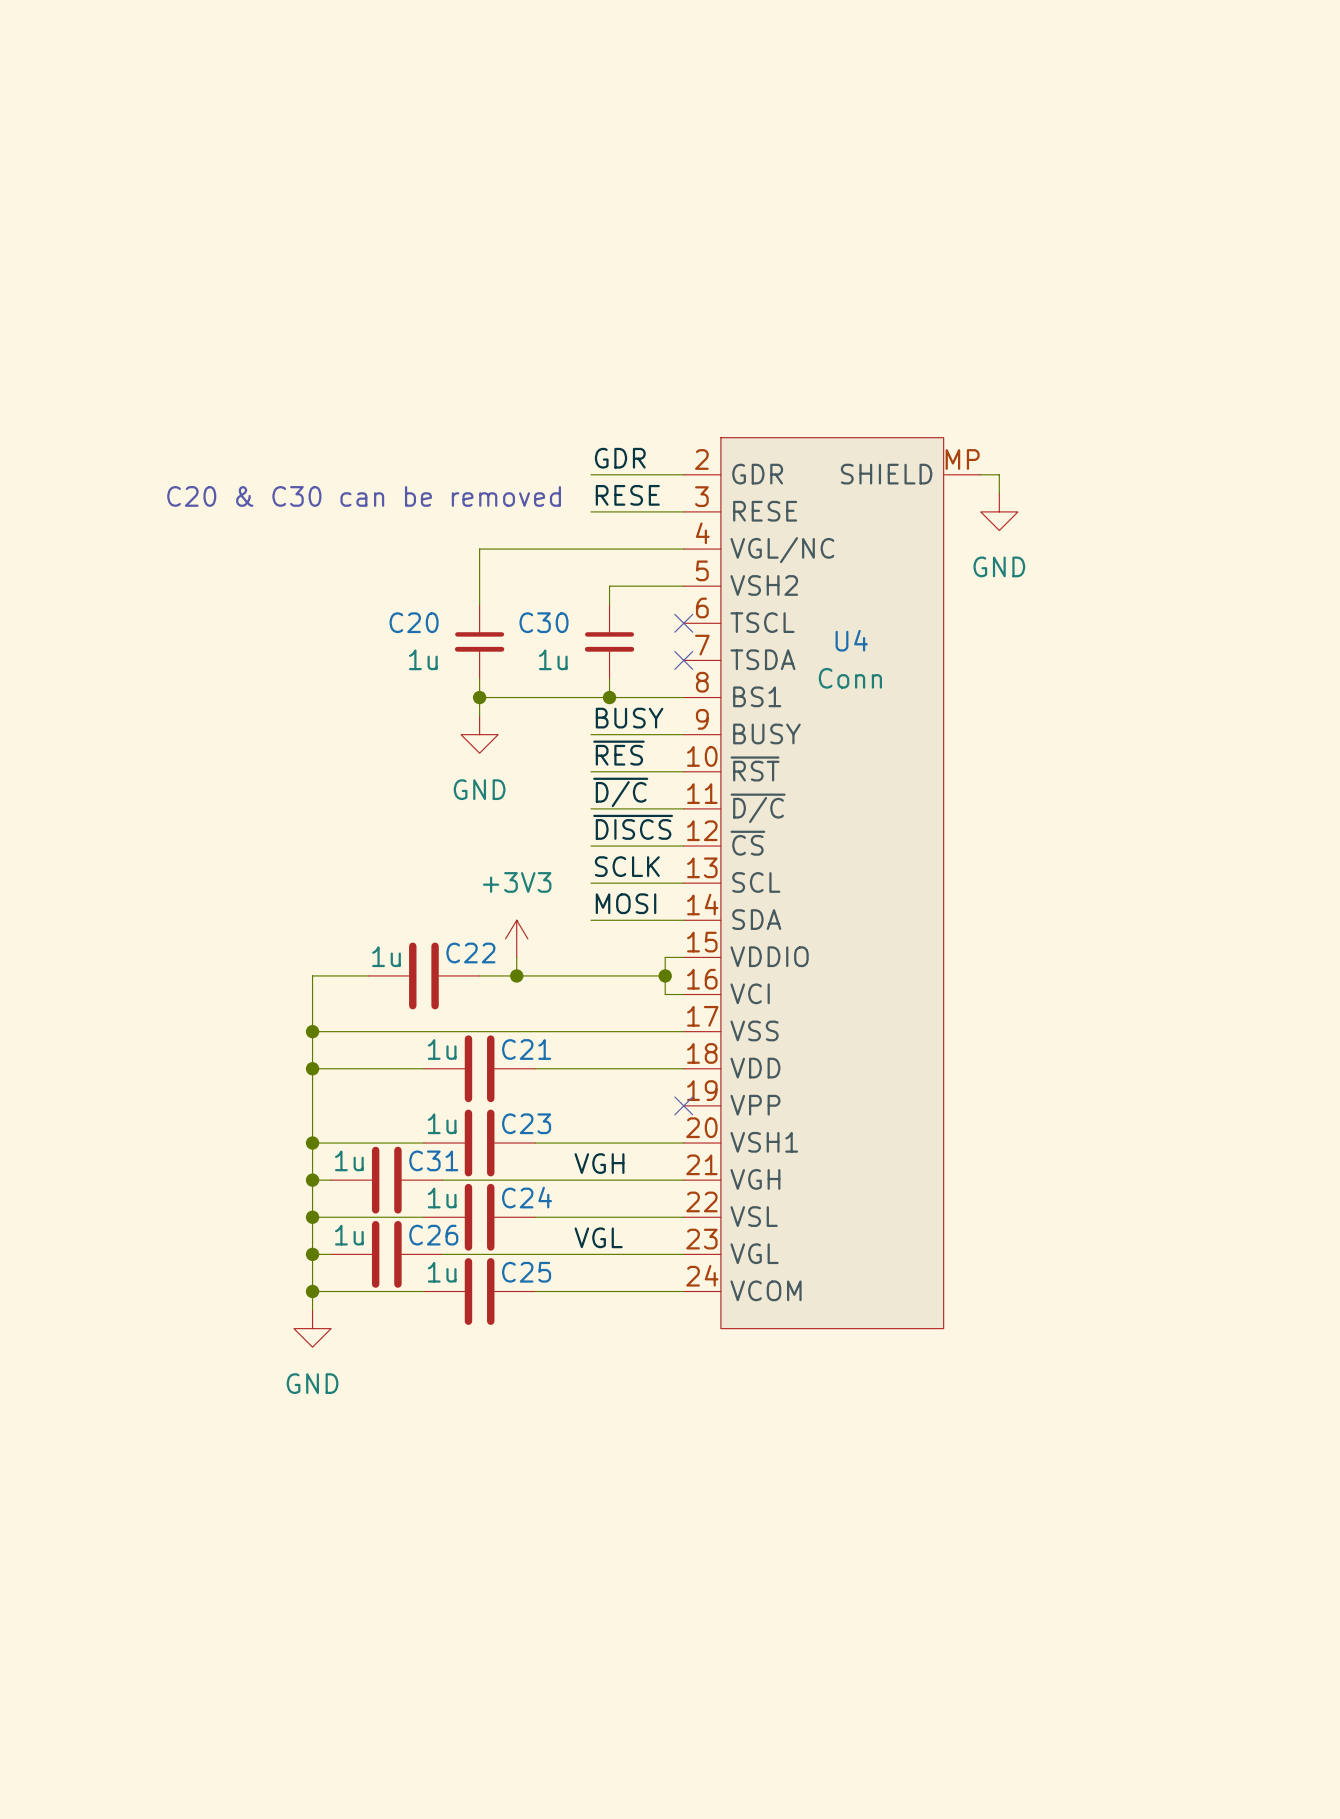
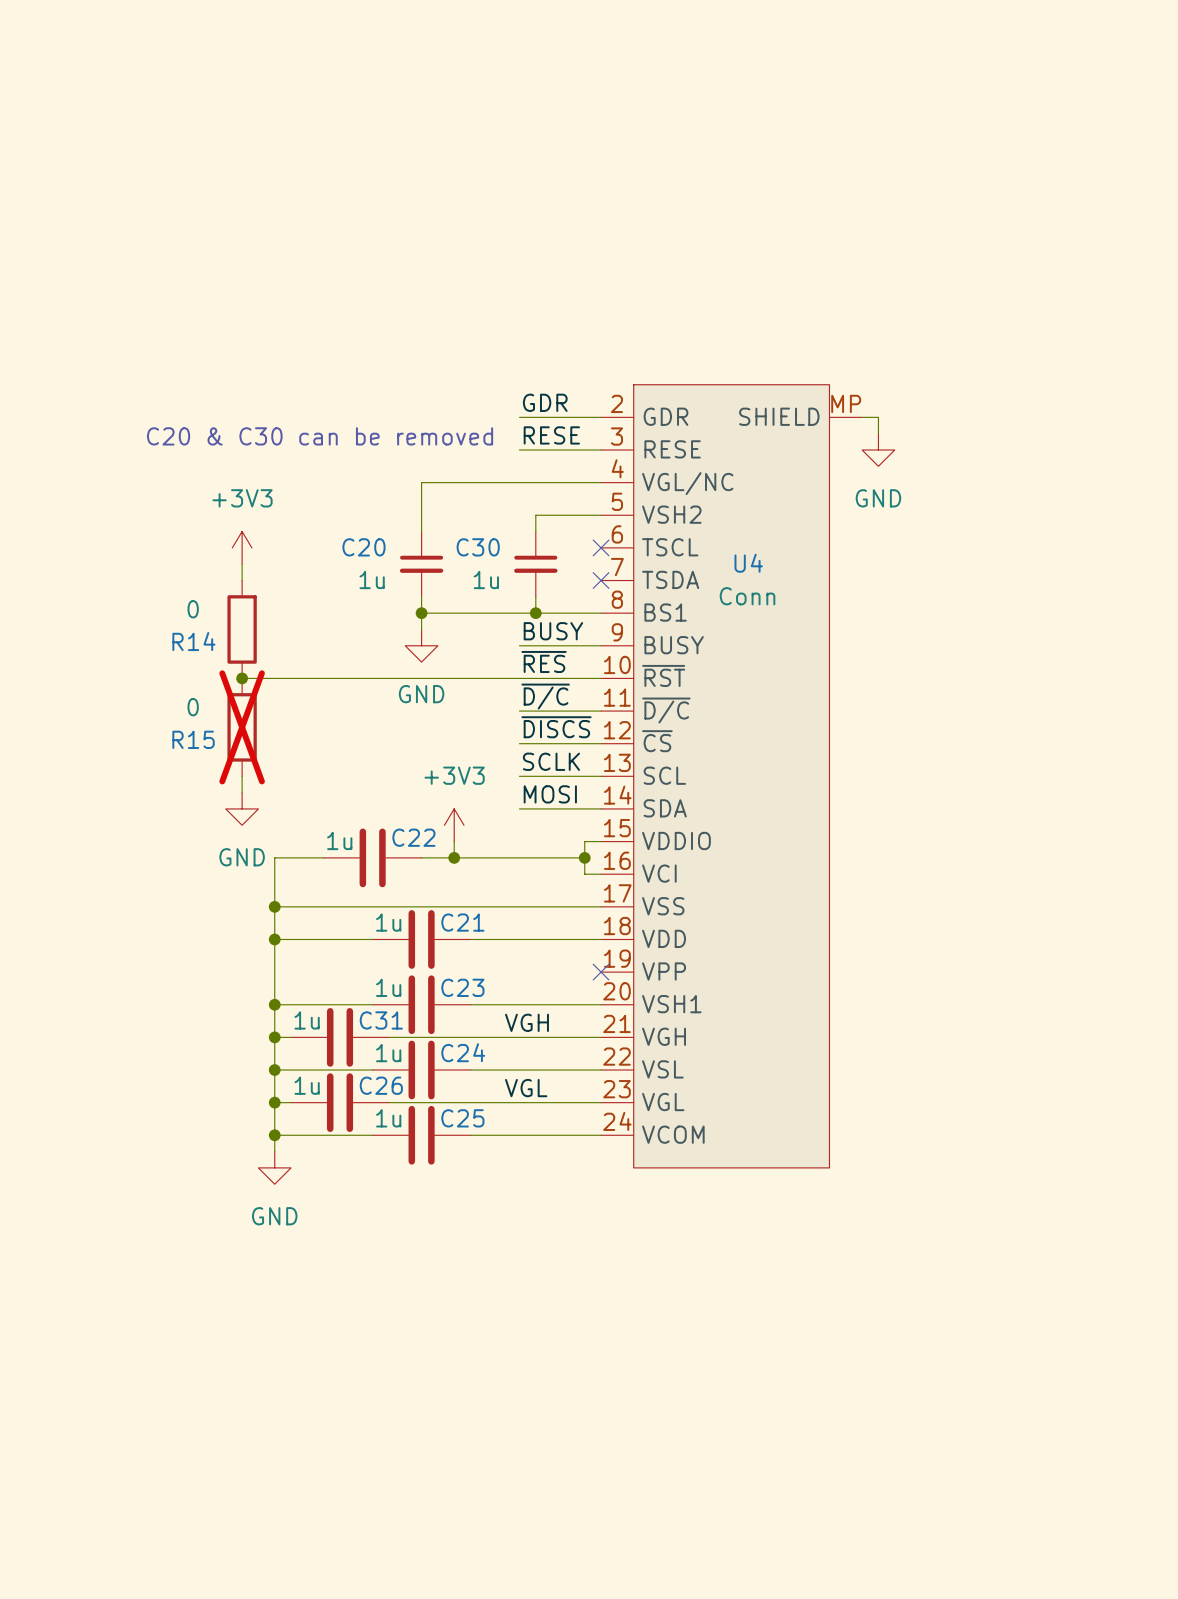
power symbol: none -> +3V3 (242, 547)
wire: none -> (242, 564) (242, 580)
R14: none -> 0 (242, 629)
wire: none -> (242, 678) (519, 678)
junction: none -> (242, 678)
R15: none -> 0 (242, 727)
wire: none -> (242, 776) (242, 792)
power symbol: none -> GND (242, 808)

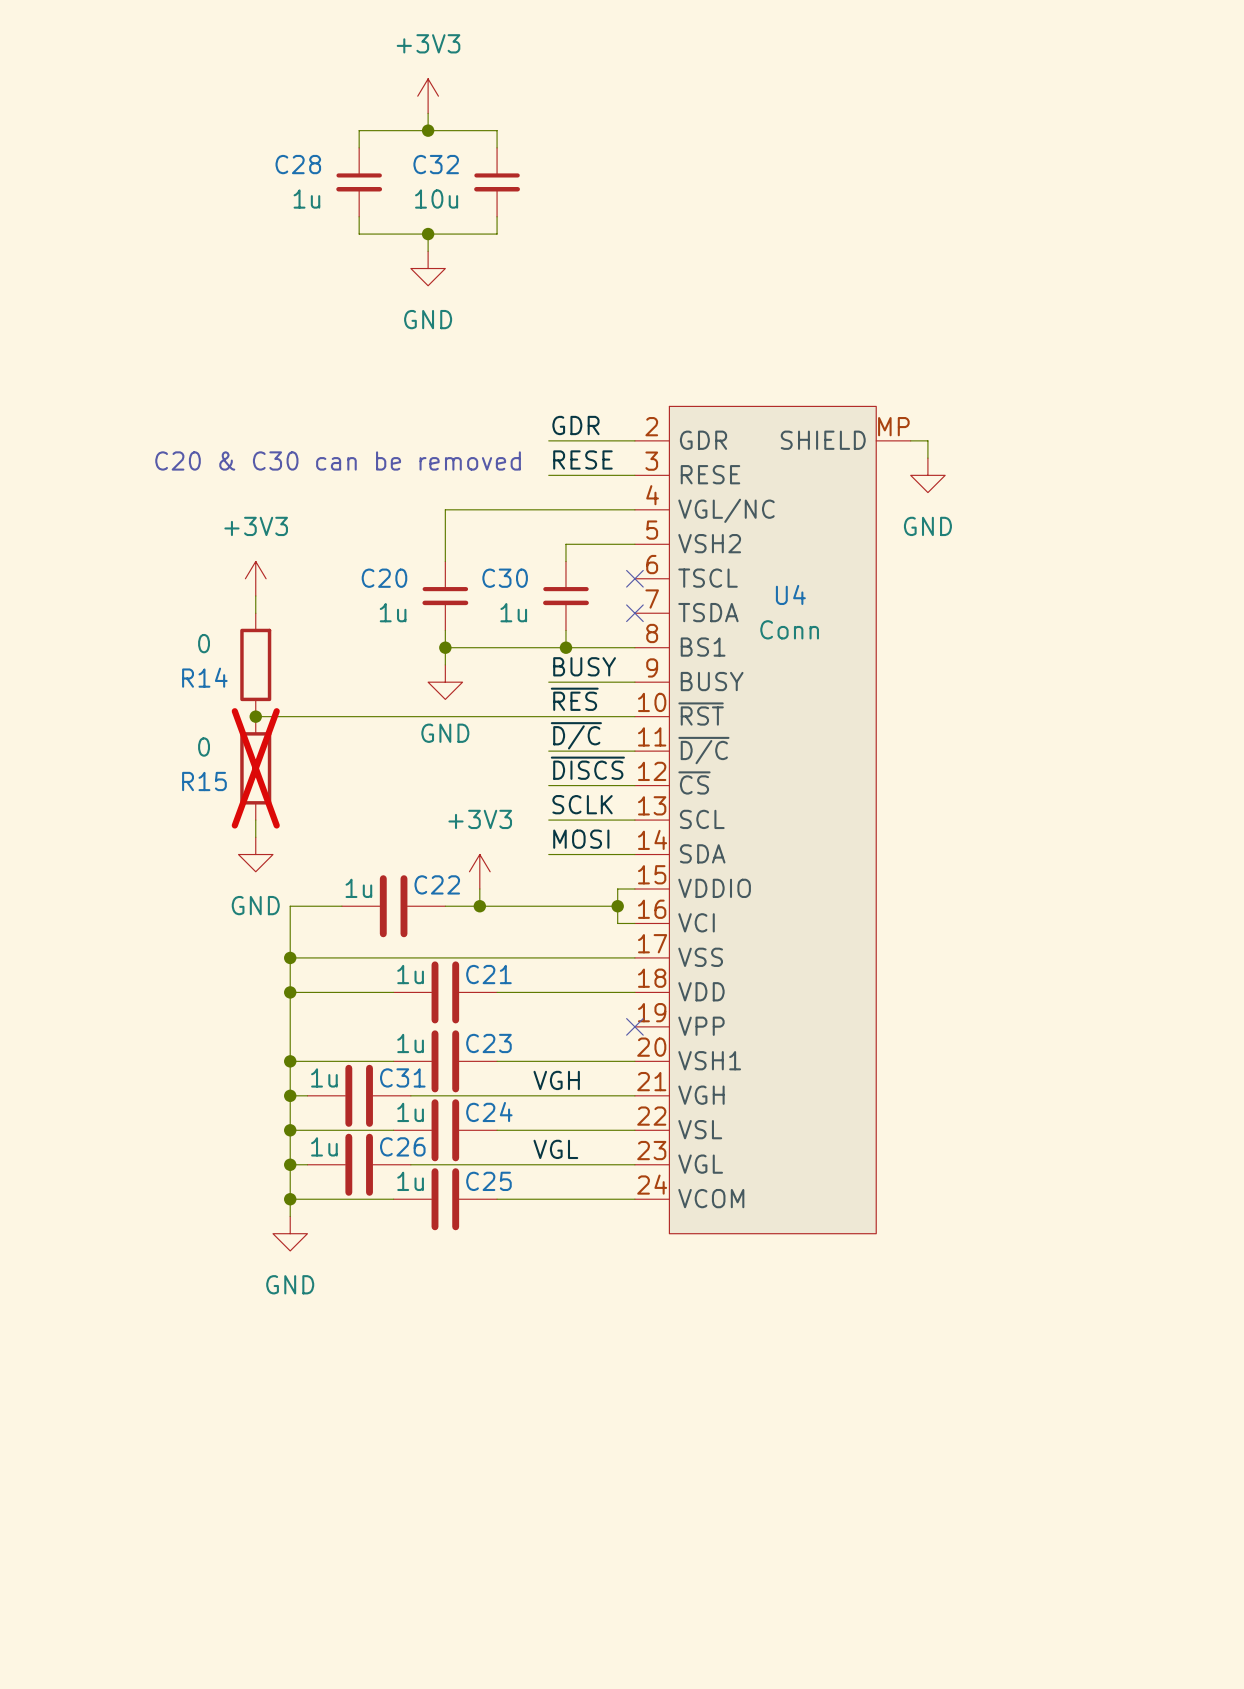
power symbol: none -> +3V3 (428, 96)
wire: none -> (428, 113) (428, 130)
junction: none -> (428, 130)
wire: none -> (359, 147) (359, 130) (497, 130) (497, 147)
C28: none -> 1u (359, 182)
C32: none -> 10u (497, 182)
wire: none -> (359, 216) (359, 234) (497, 234) (497, 216)
wire: none -> (428, 234) (428, 251)
junction: none -> (428, 234)
power symbol: none -> GND (428, 268)

